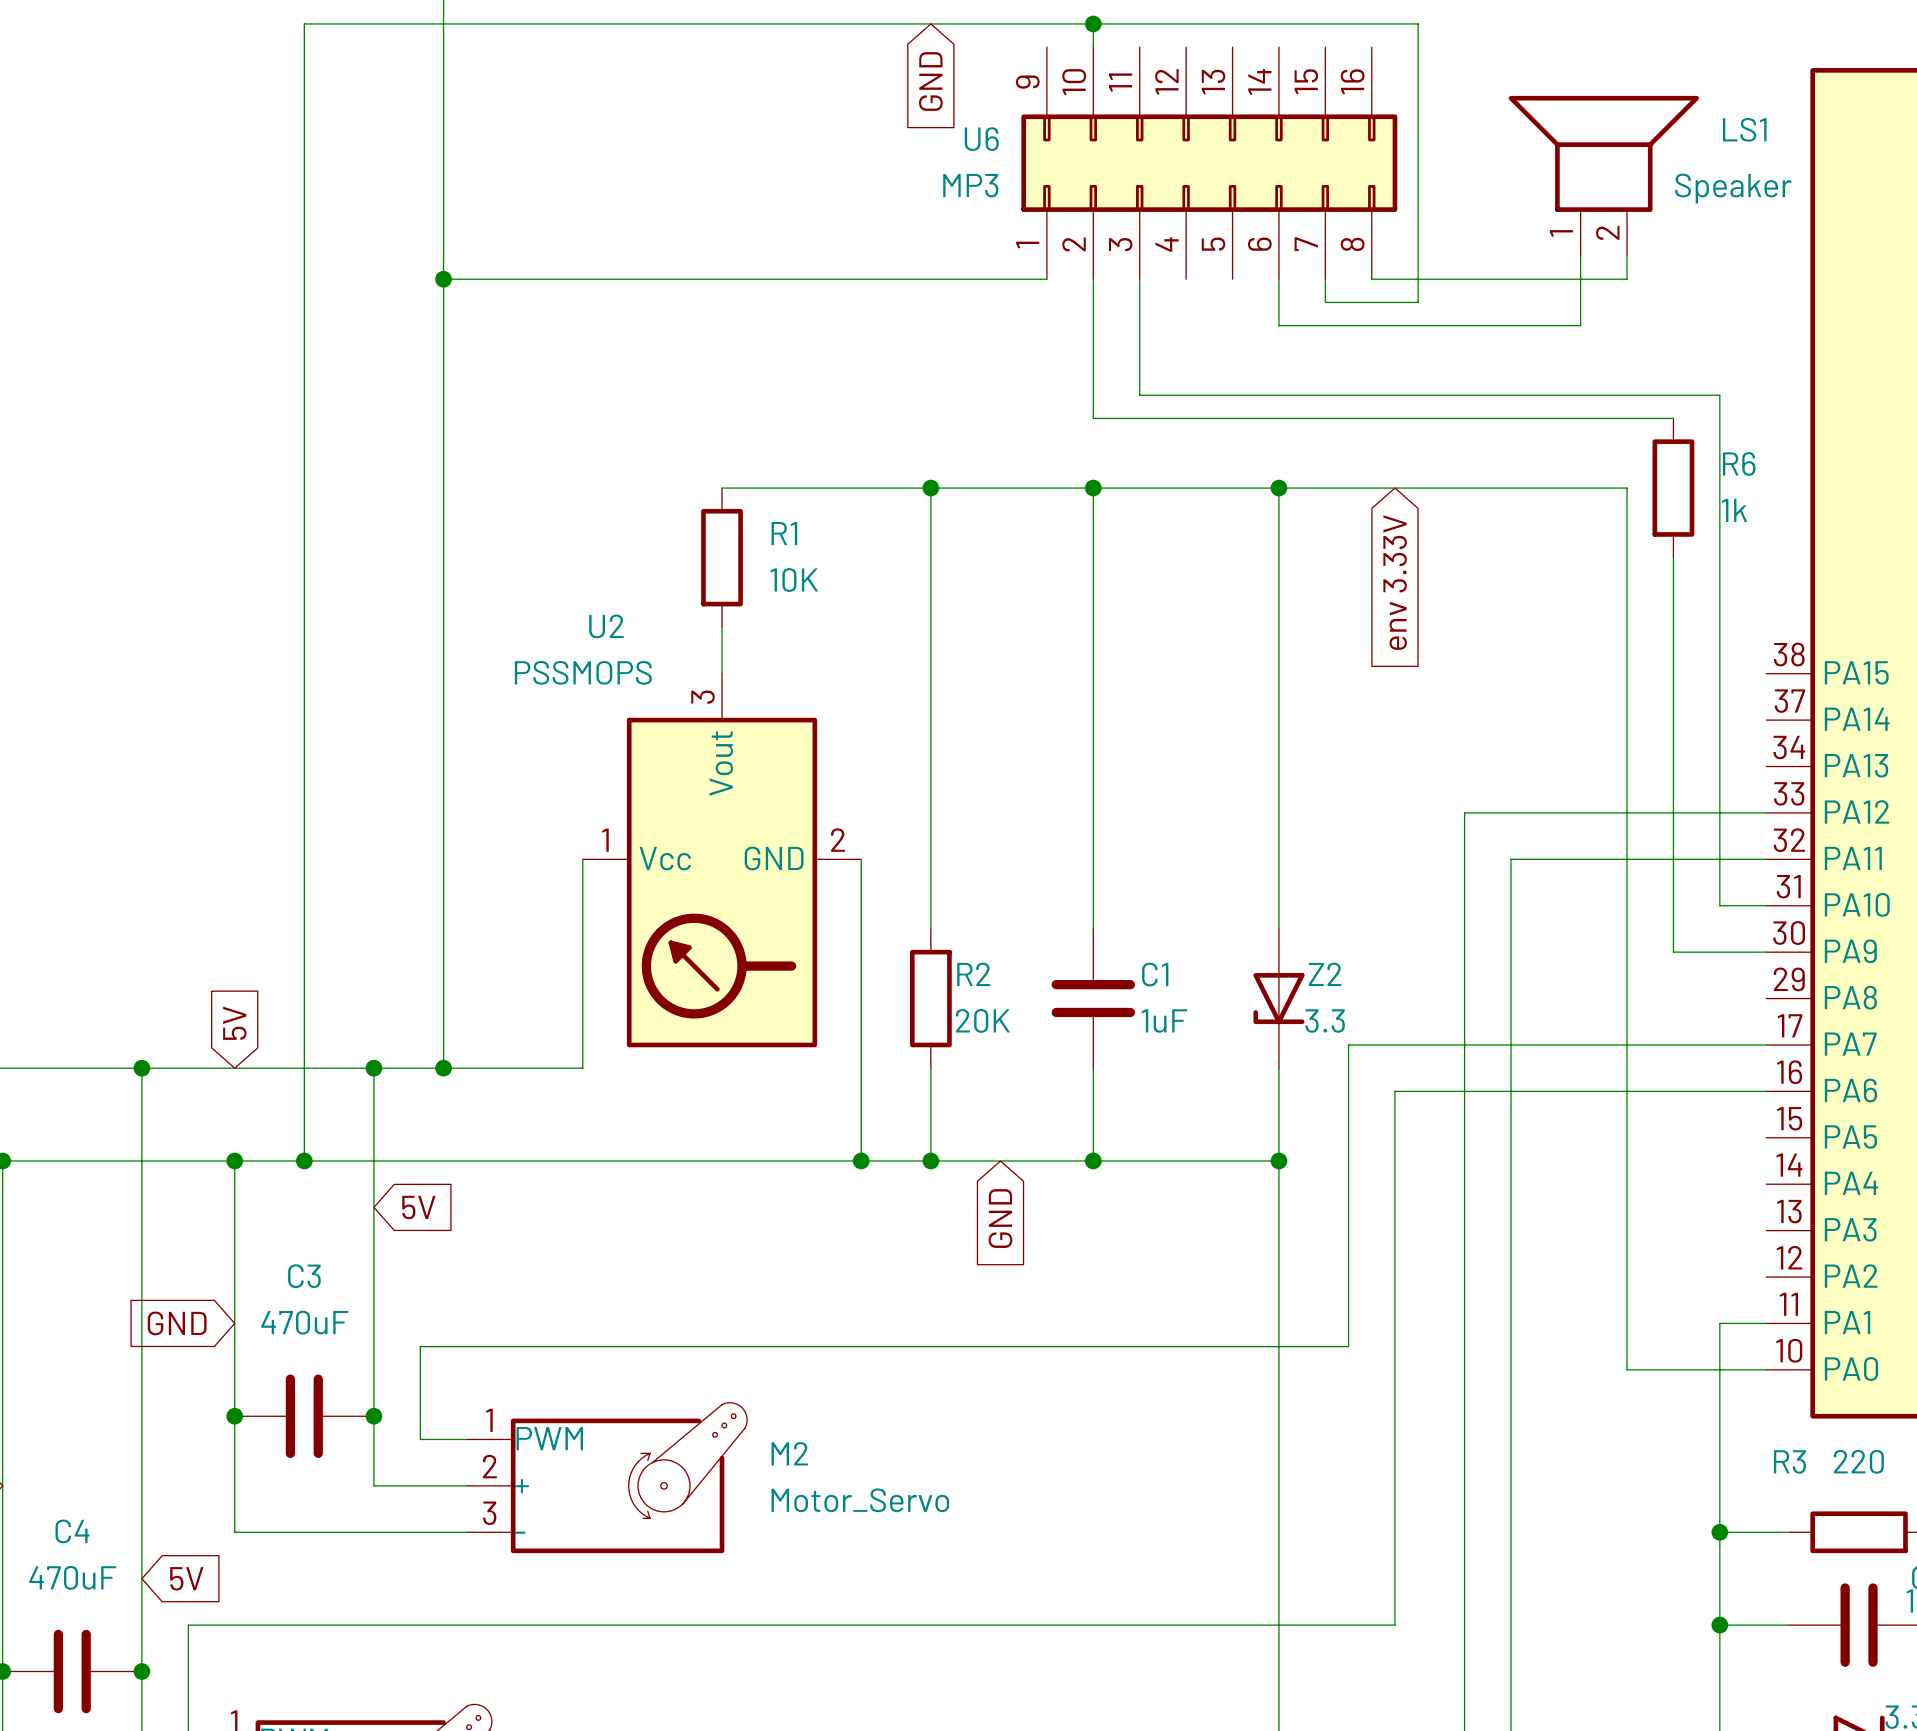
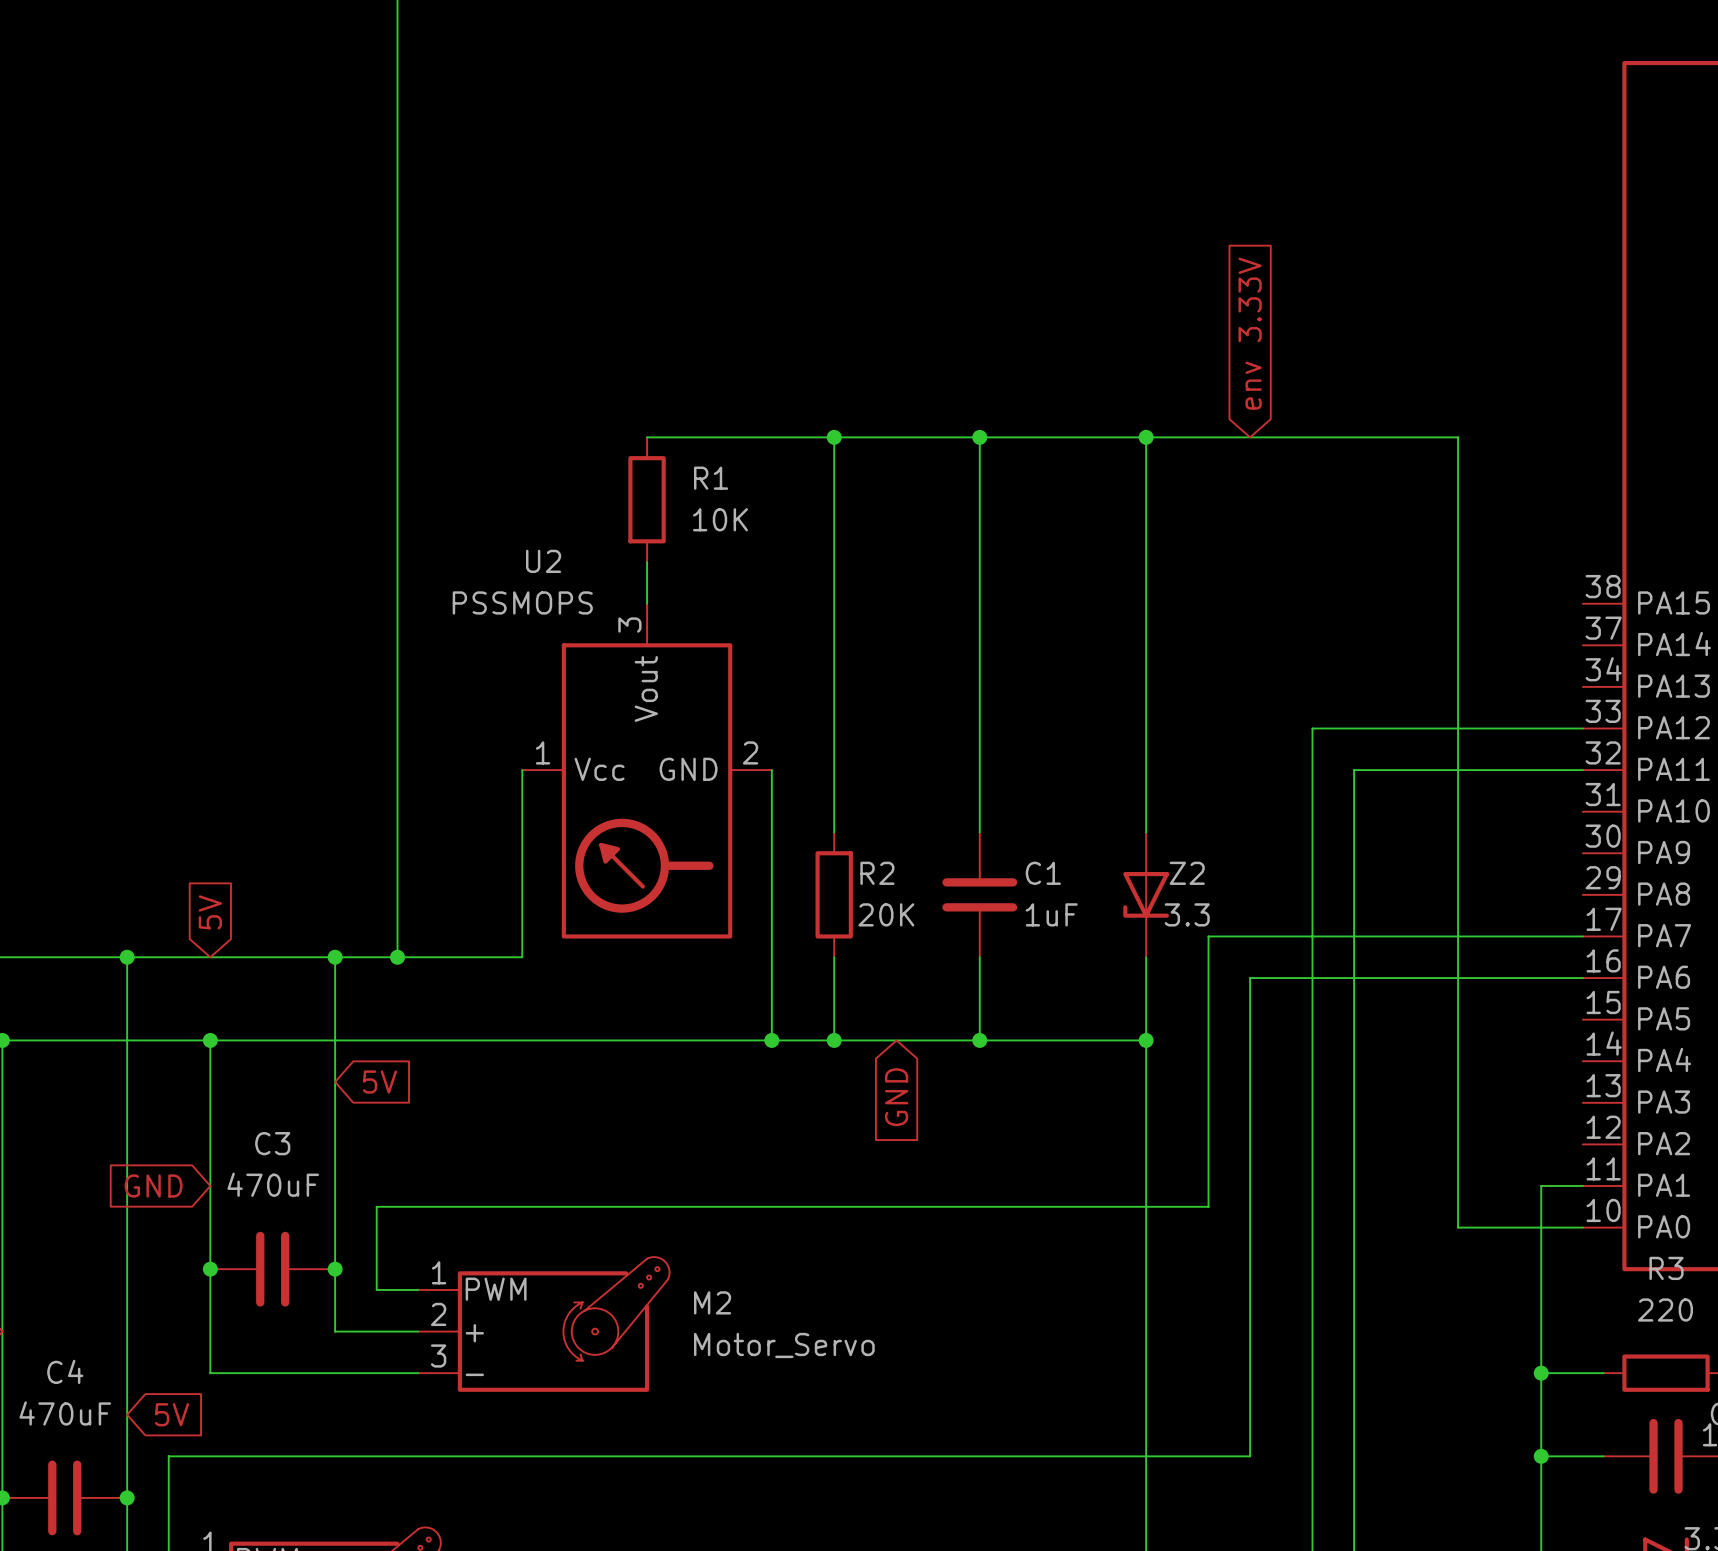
wire: (1093, 23) (1093, 47) -> none
junction: (1093, 23) -> none
global label: GND (930, 81) -> none
U6: MP3 (1209, 163) -> none
LS1: Speaker (1603, 175) -> none
wire: (1580, 256) (1580, 325) (1278, 325) (1278, 279) -> none
wire: (1627, 256) (1627, 279) (1371, 279) -> none
wire: (443, 279) (1046, 279) -> none
junction: (443, 279) -> none
wire: (1093, 279) (1093, 418) (1673, 418) -> none
wire: (1139, 279) (1139, 395) (1719, 395) (1719, 905) (1766, 905) -> none
wire: (1325, 279) (1325, 302) (1418, 302) (1418, 23) (304, 23) (304, 1161) -> none
R6: 1k (1673, 488) -> none
wire: (1673, 557) (1673, 952) (1766, 952) -> none
global label rotation: 0° (1395, 582) -> 180° (1250, 333)
junction: (304, 1161) -> none
R3 name position: R3 (1789, 1461) -> R3 (1666, 1268)

